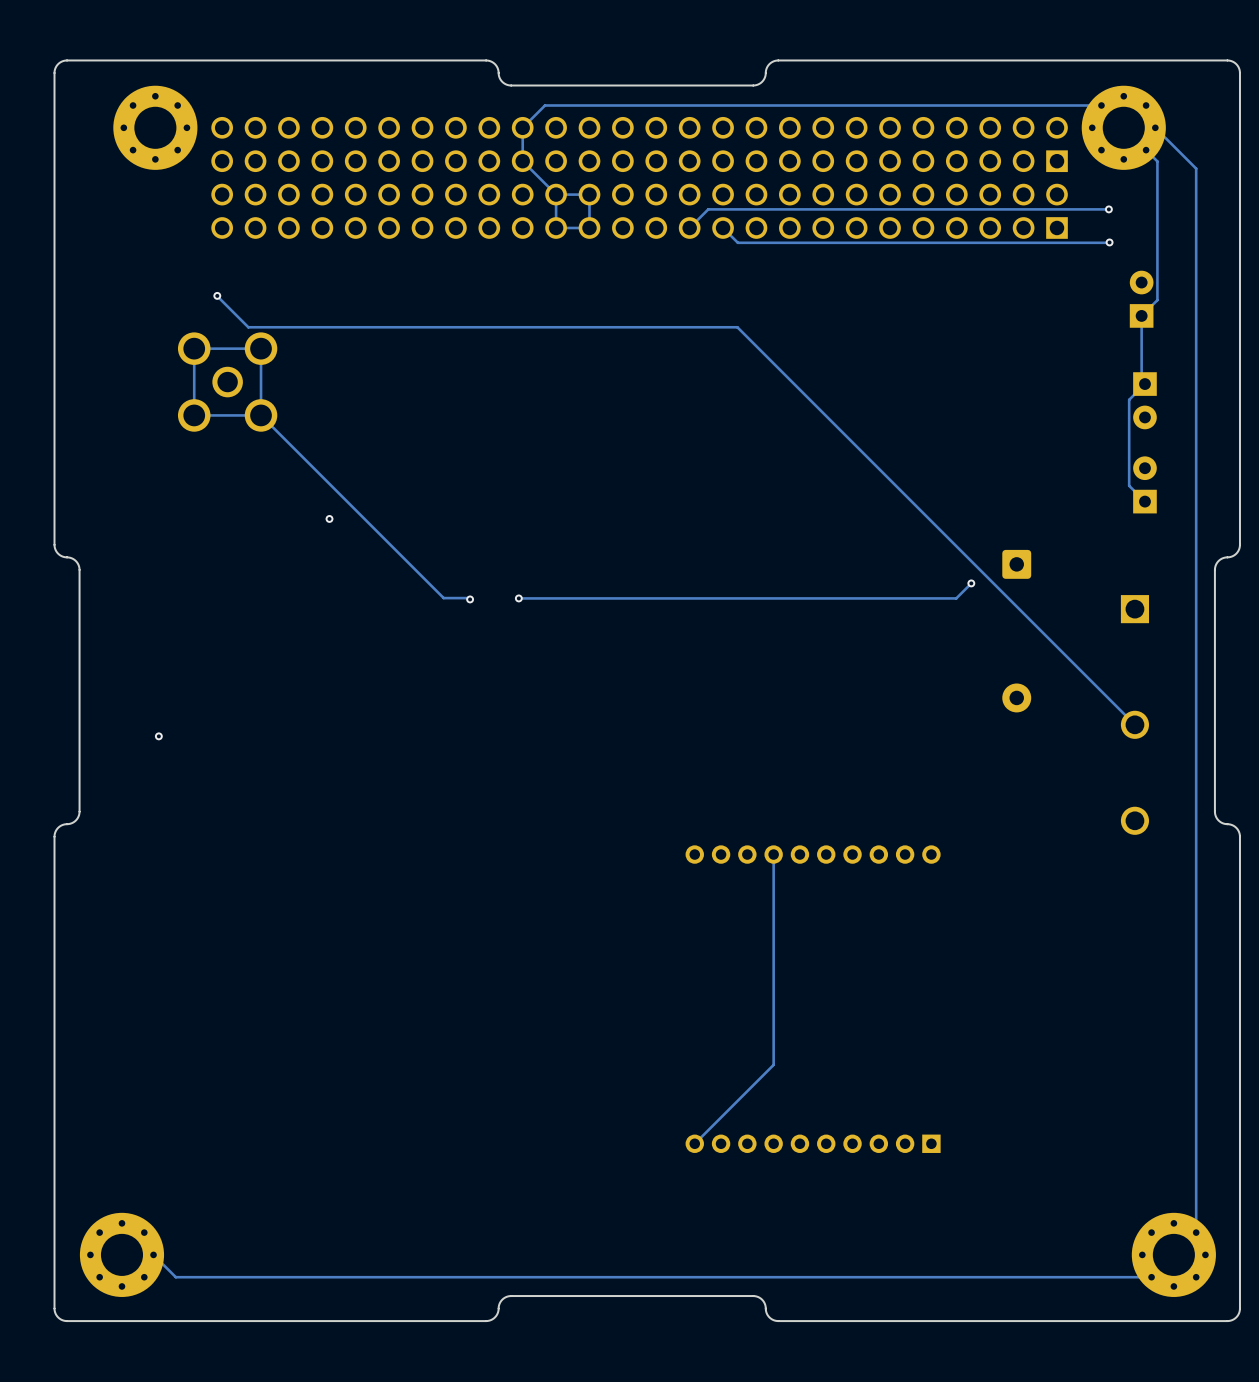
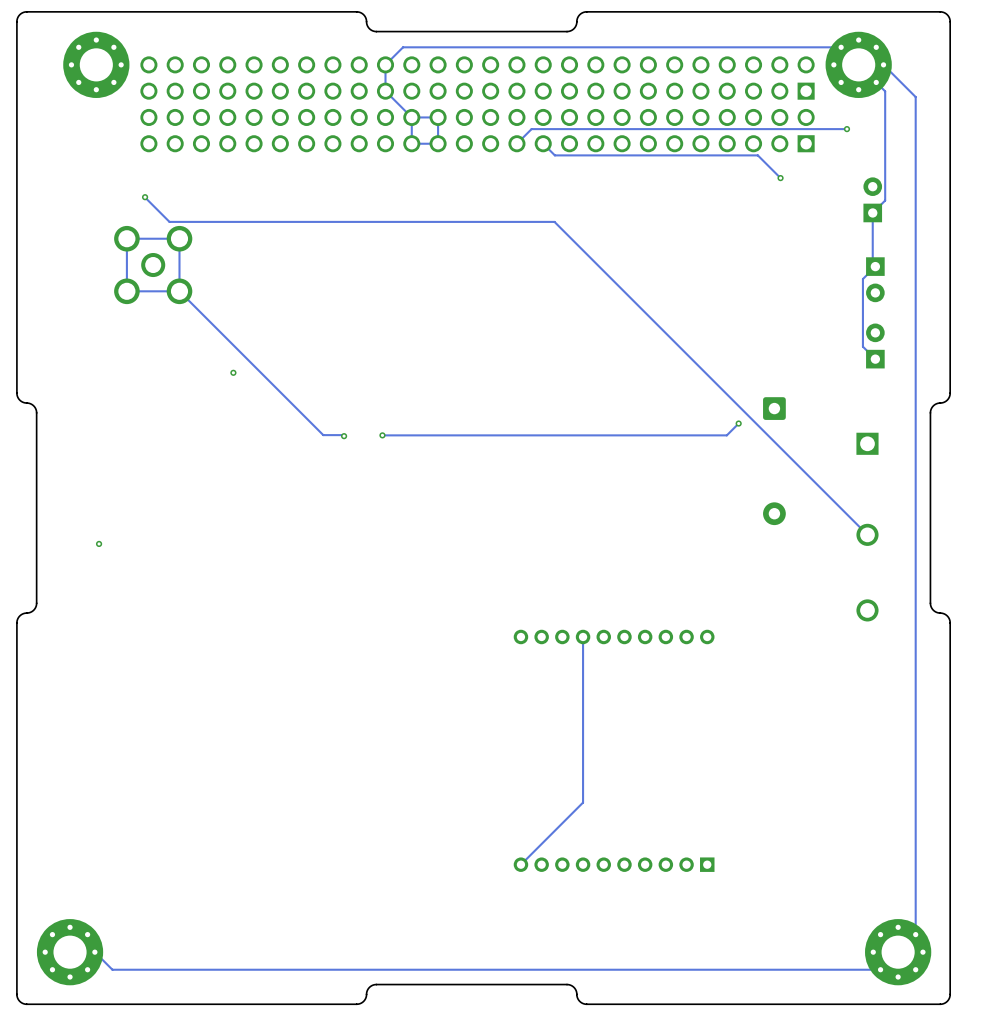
track: (1109, 242) (995, 242) -> (780, 178) (757, 155)
via: (1109, 242) -> none
via: none -> (780, 178)

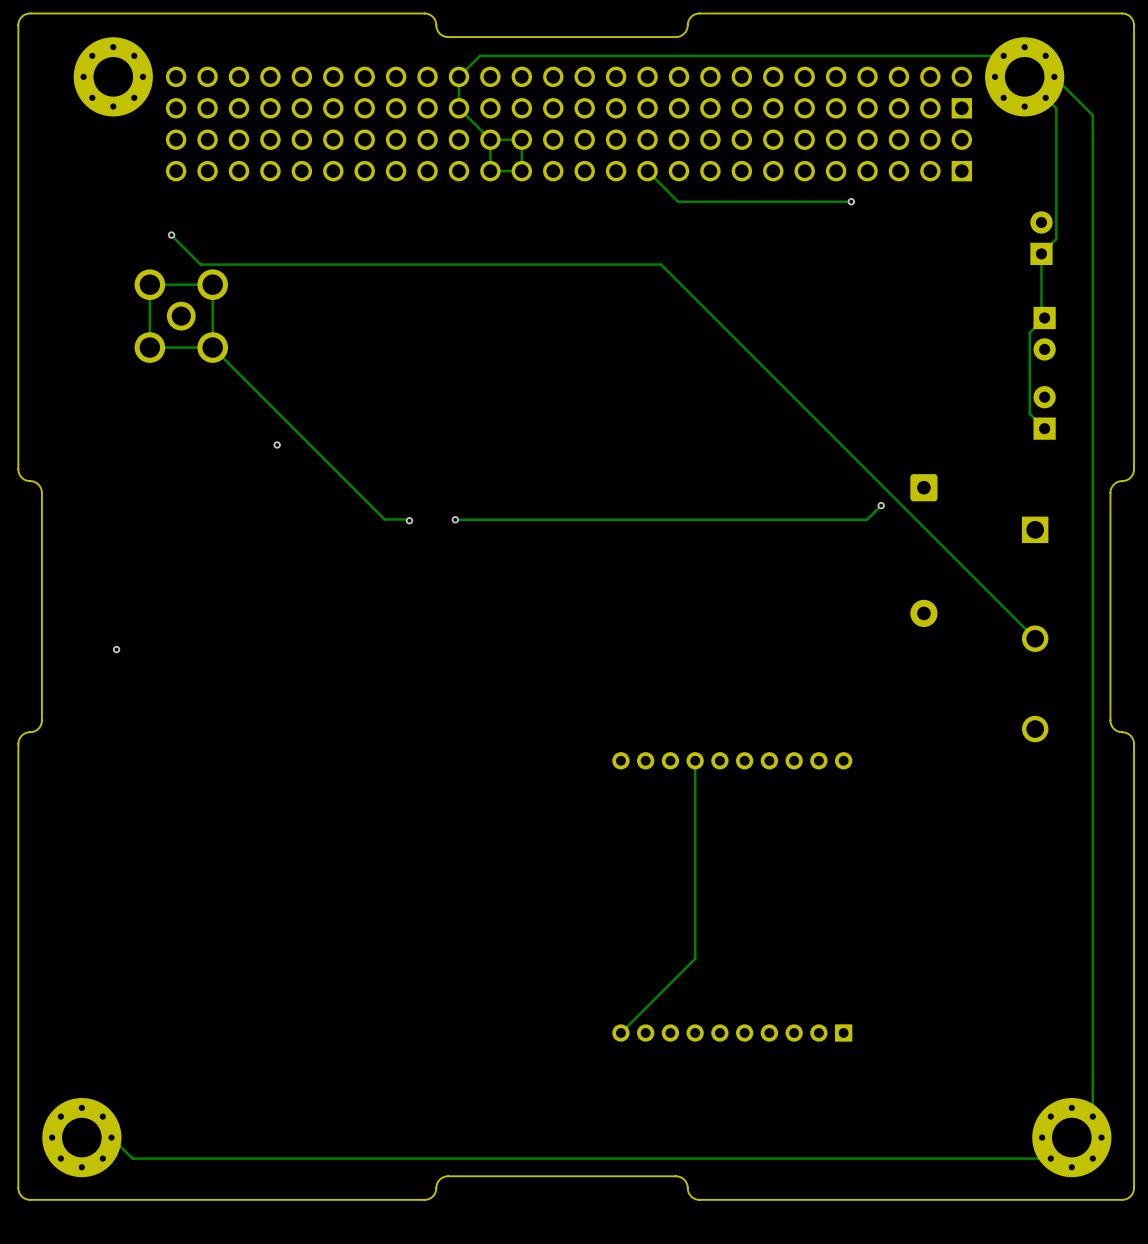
track: (846, 129) (531, 129) (516, 143) -> none
via: (846, 129) -> none
track: (554, 155) (757, 155) (780, 178) -> (661, 185) (678, 201) (851, 201)
via: none -> (851, 201)
via: (780, 178) -> none

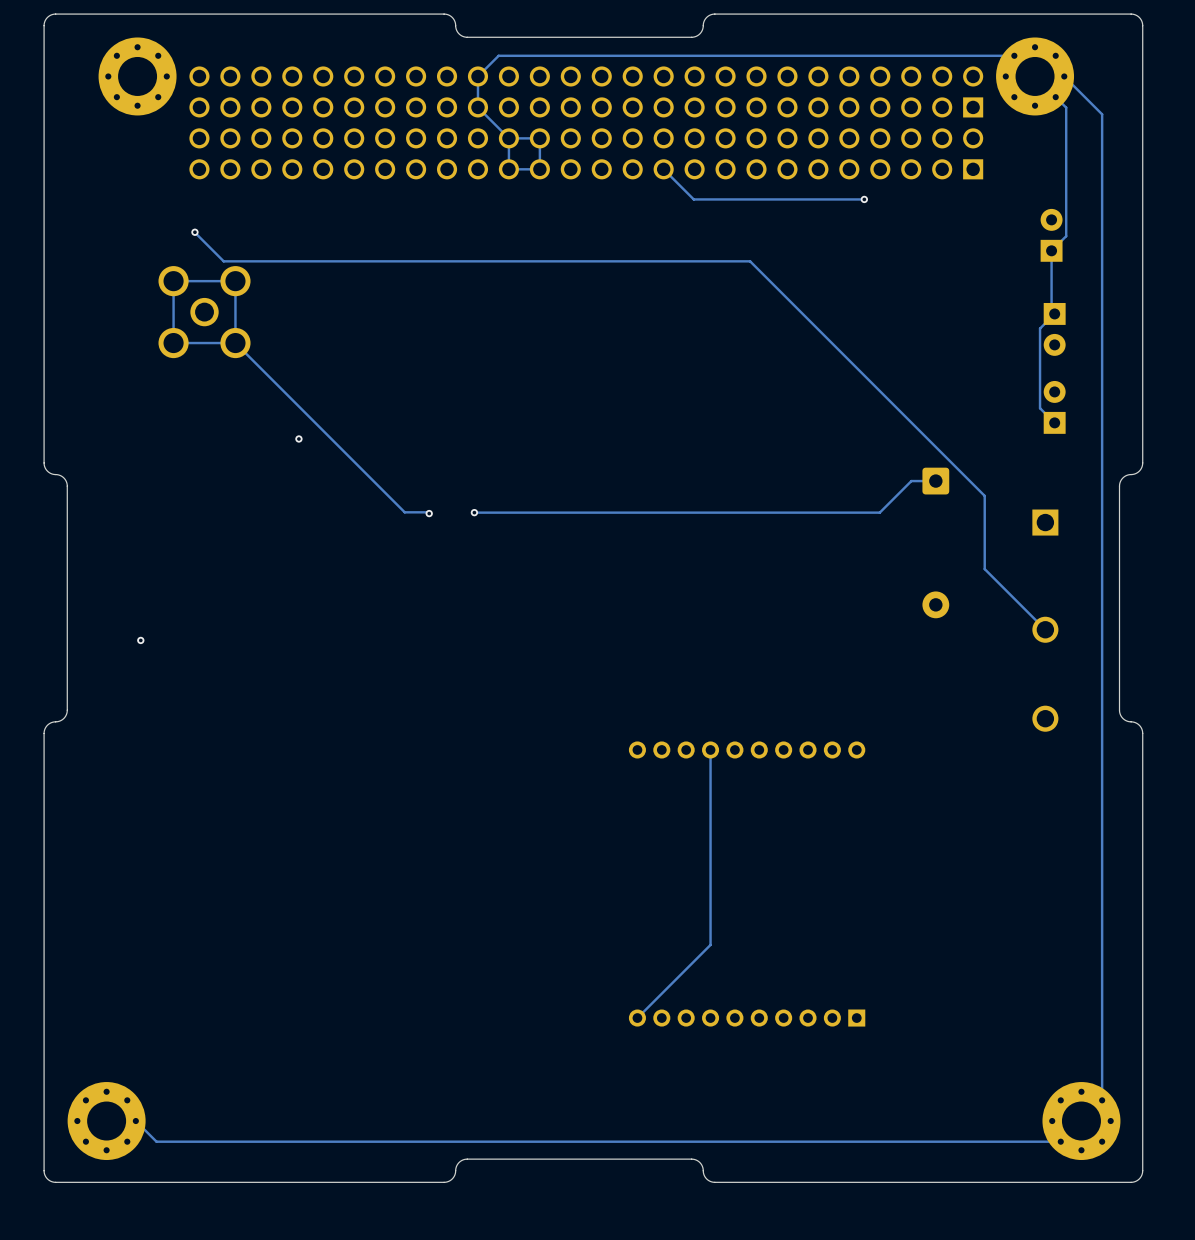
track: (661, 264) (973, 577) -> (676, 261) (750, 261) (984, 495) (984, 569)
track: none -> (935, 481) (911, 481) (893, 498)
via: (881, 505) -> none

